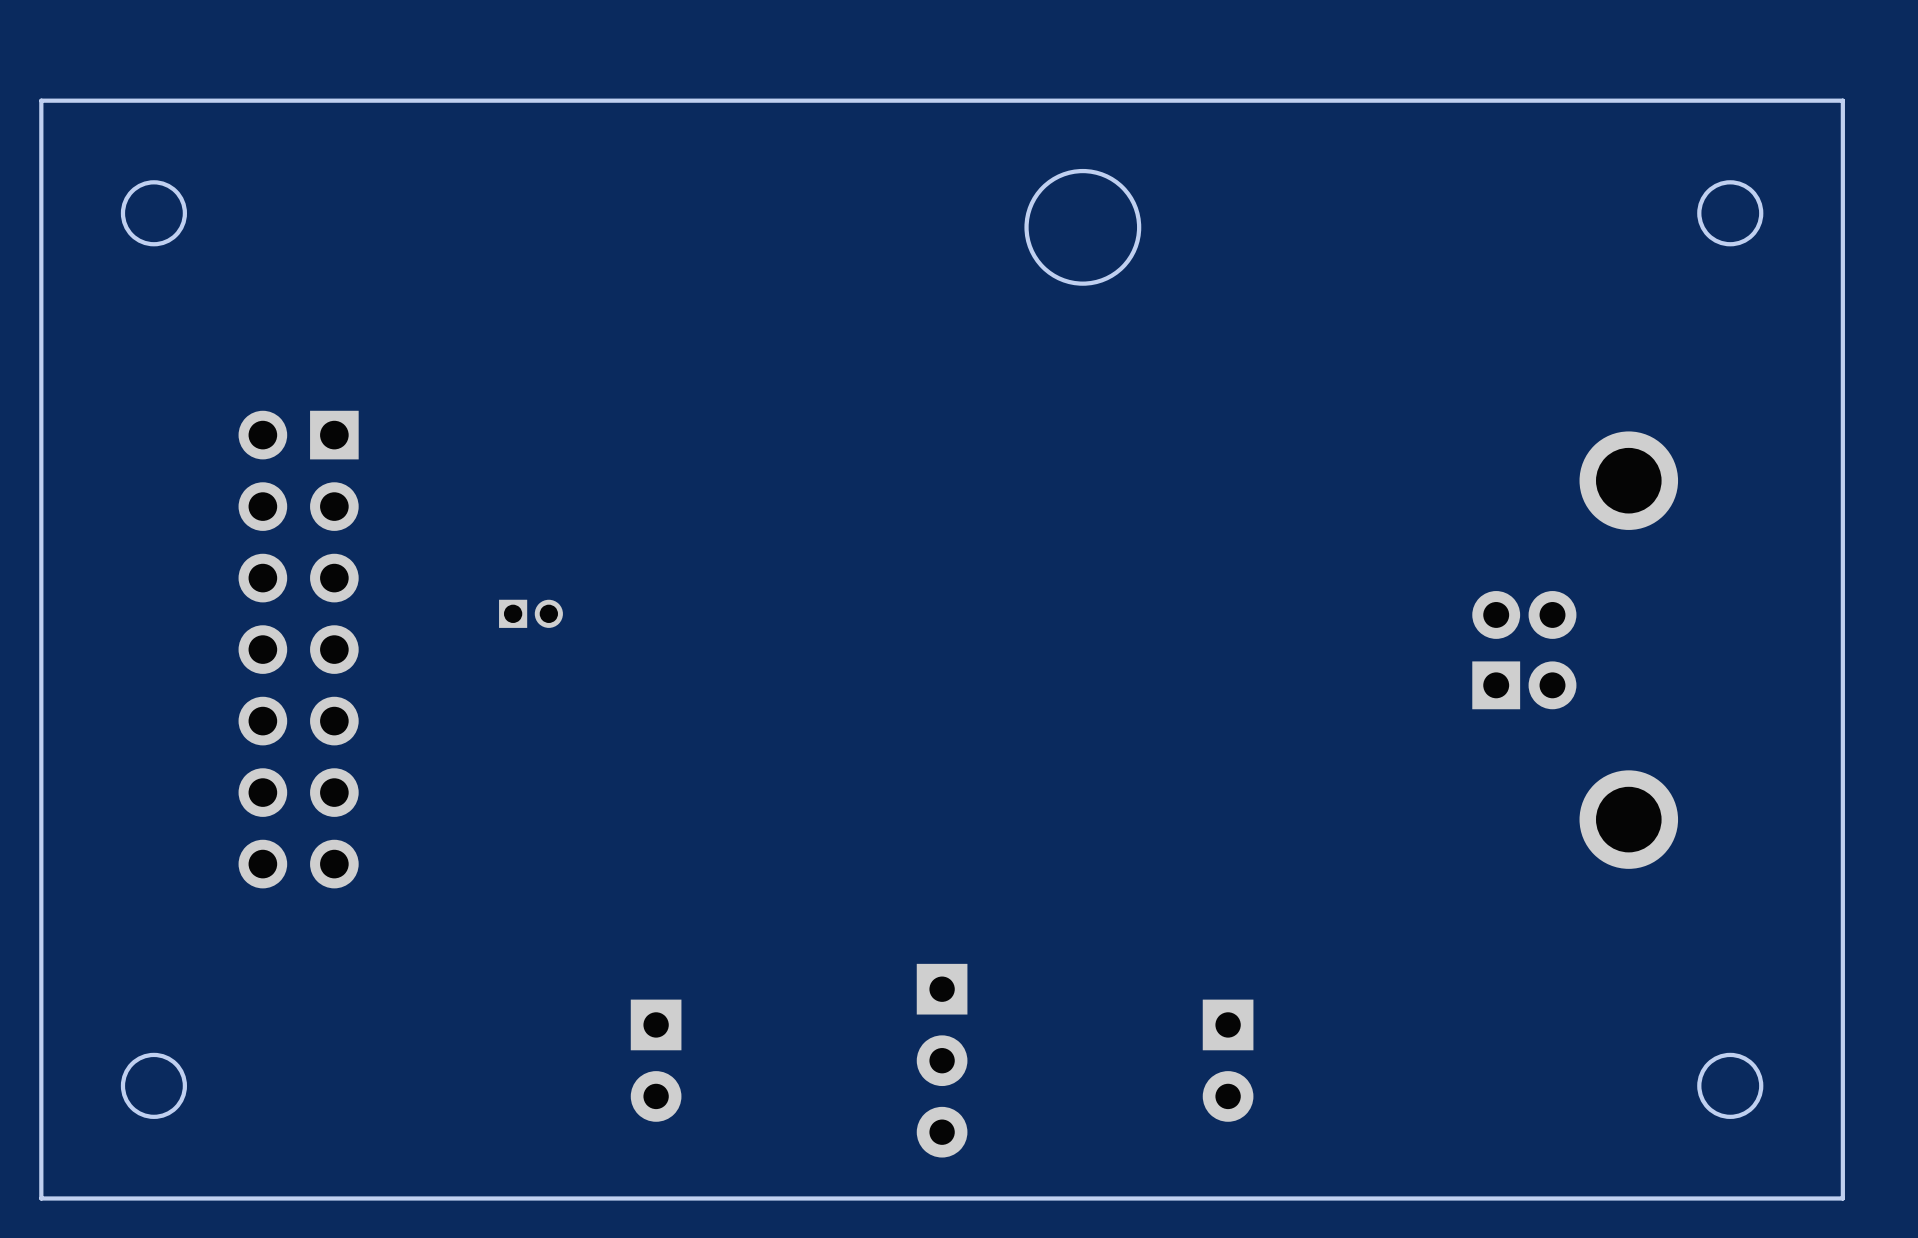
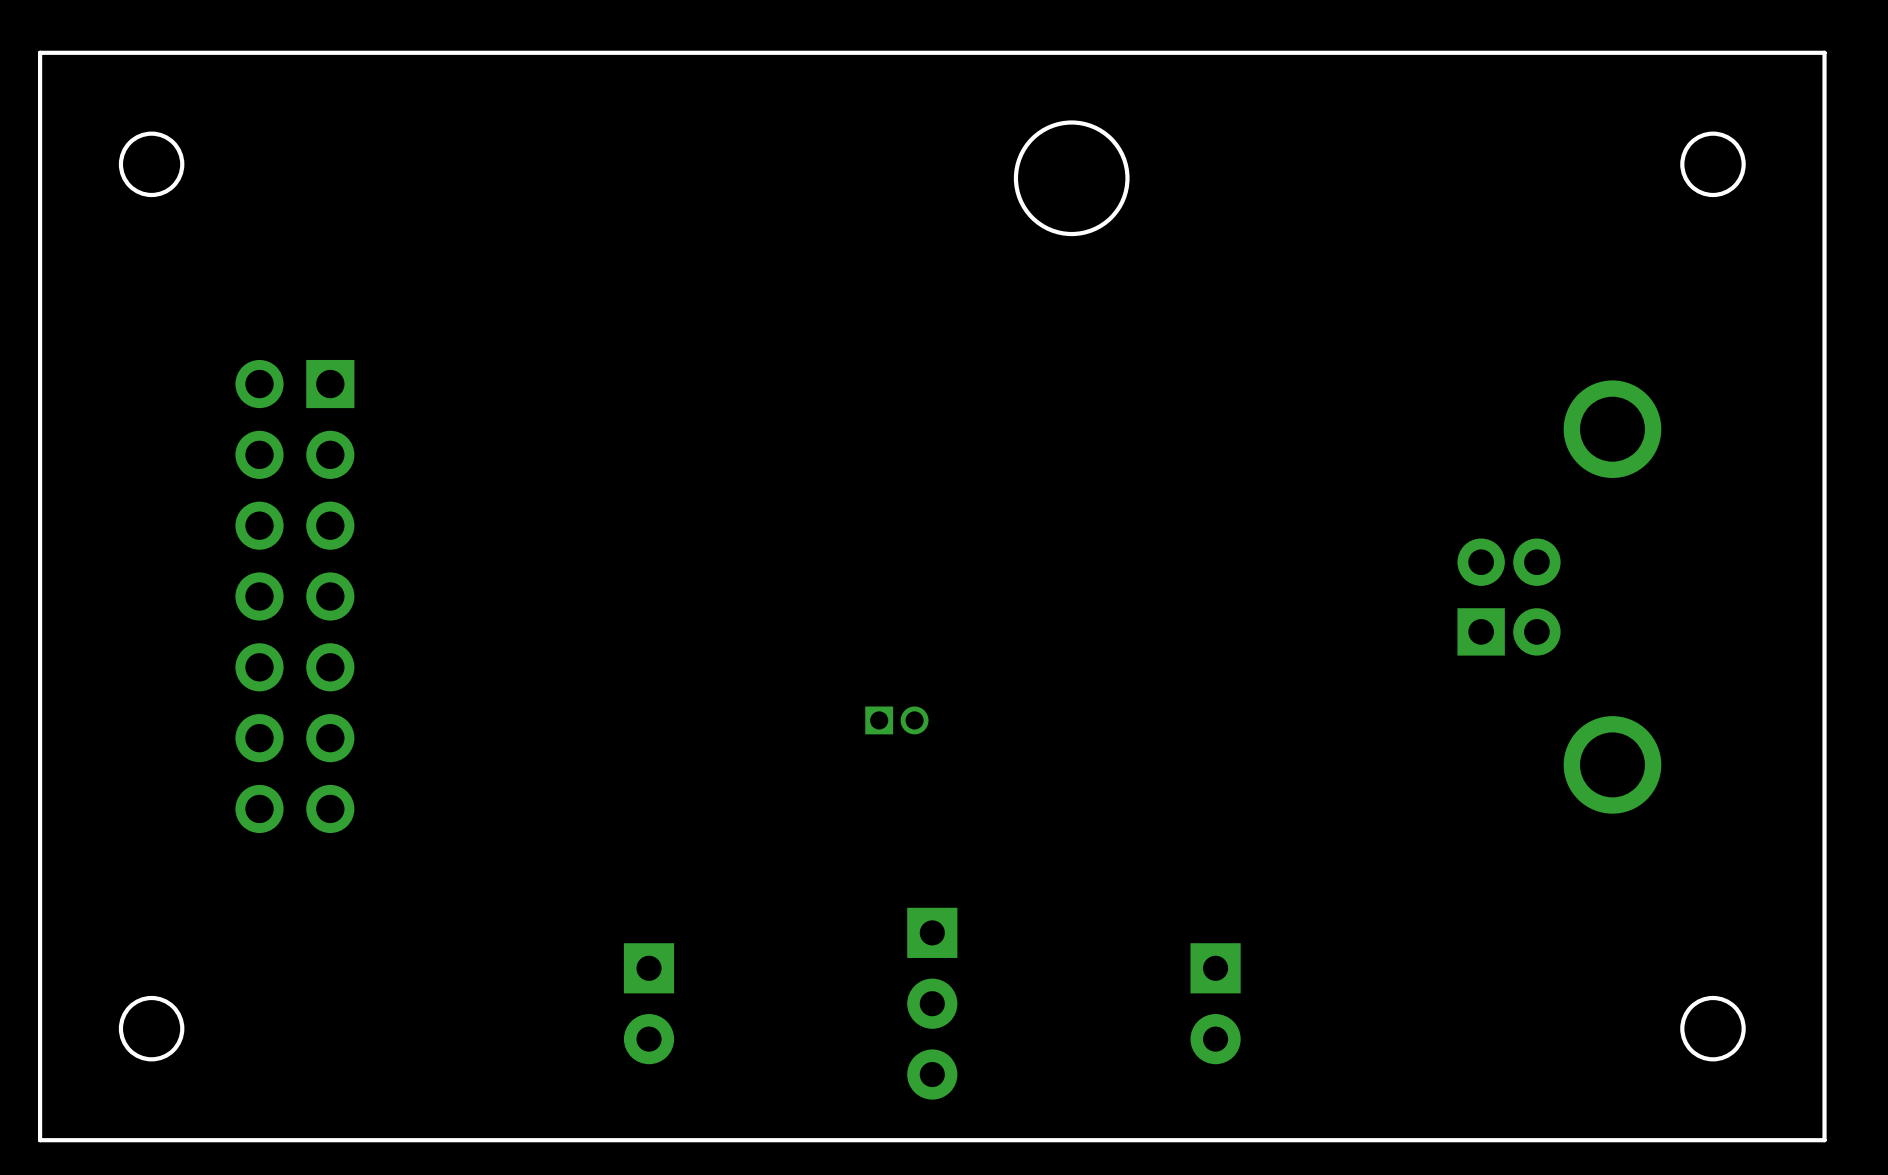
part position: (530, 613) -> (896, 720)

